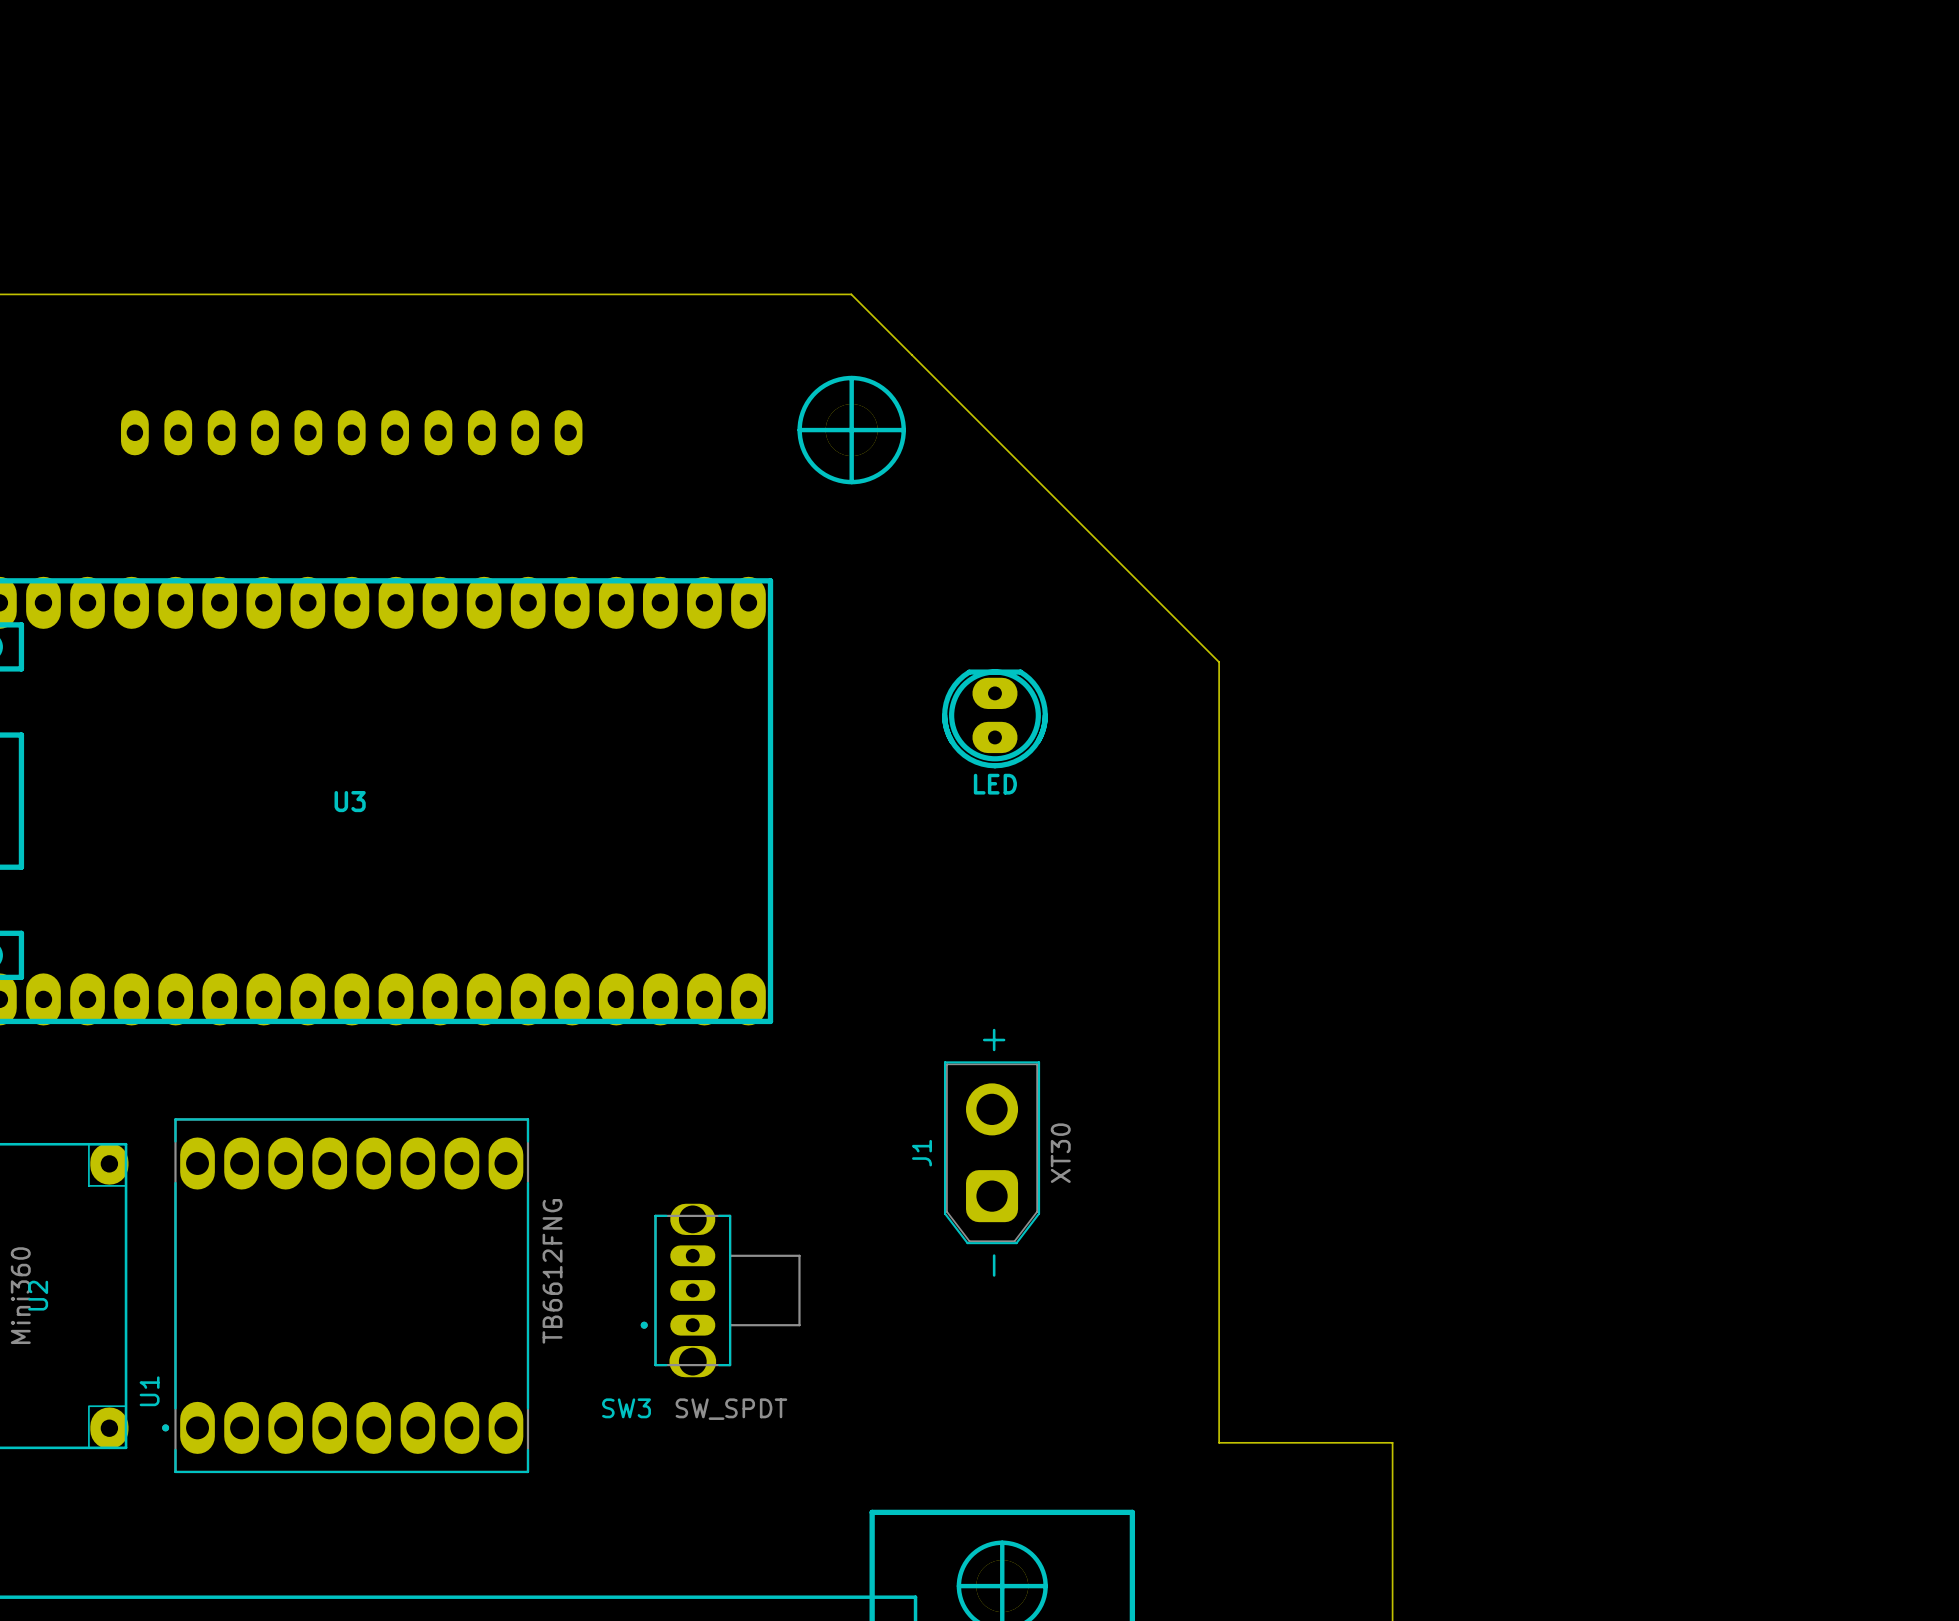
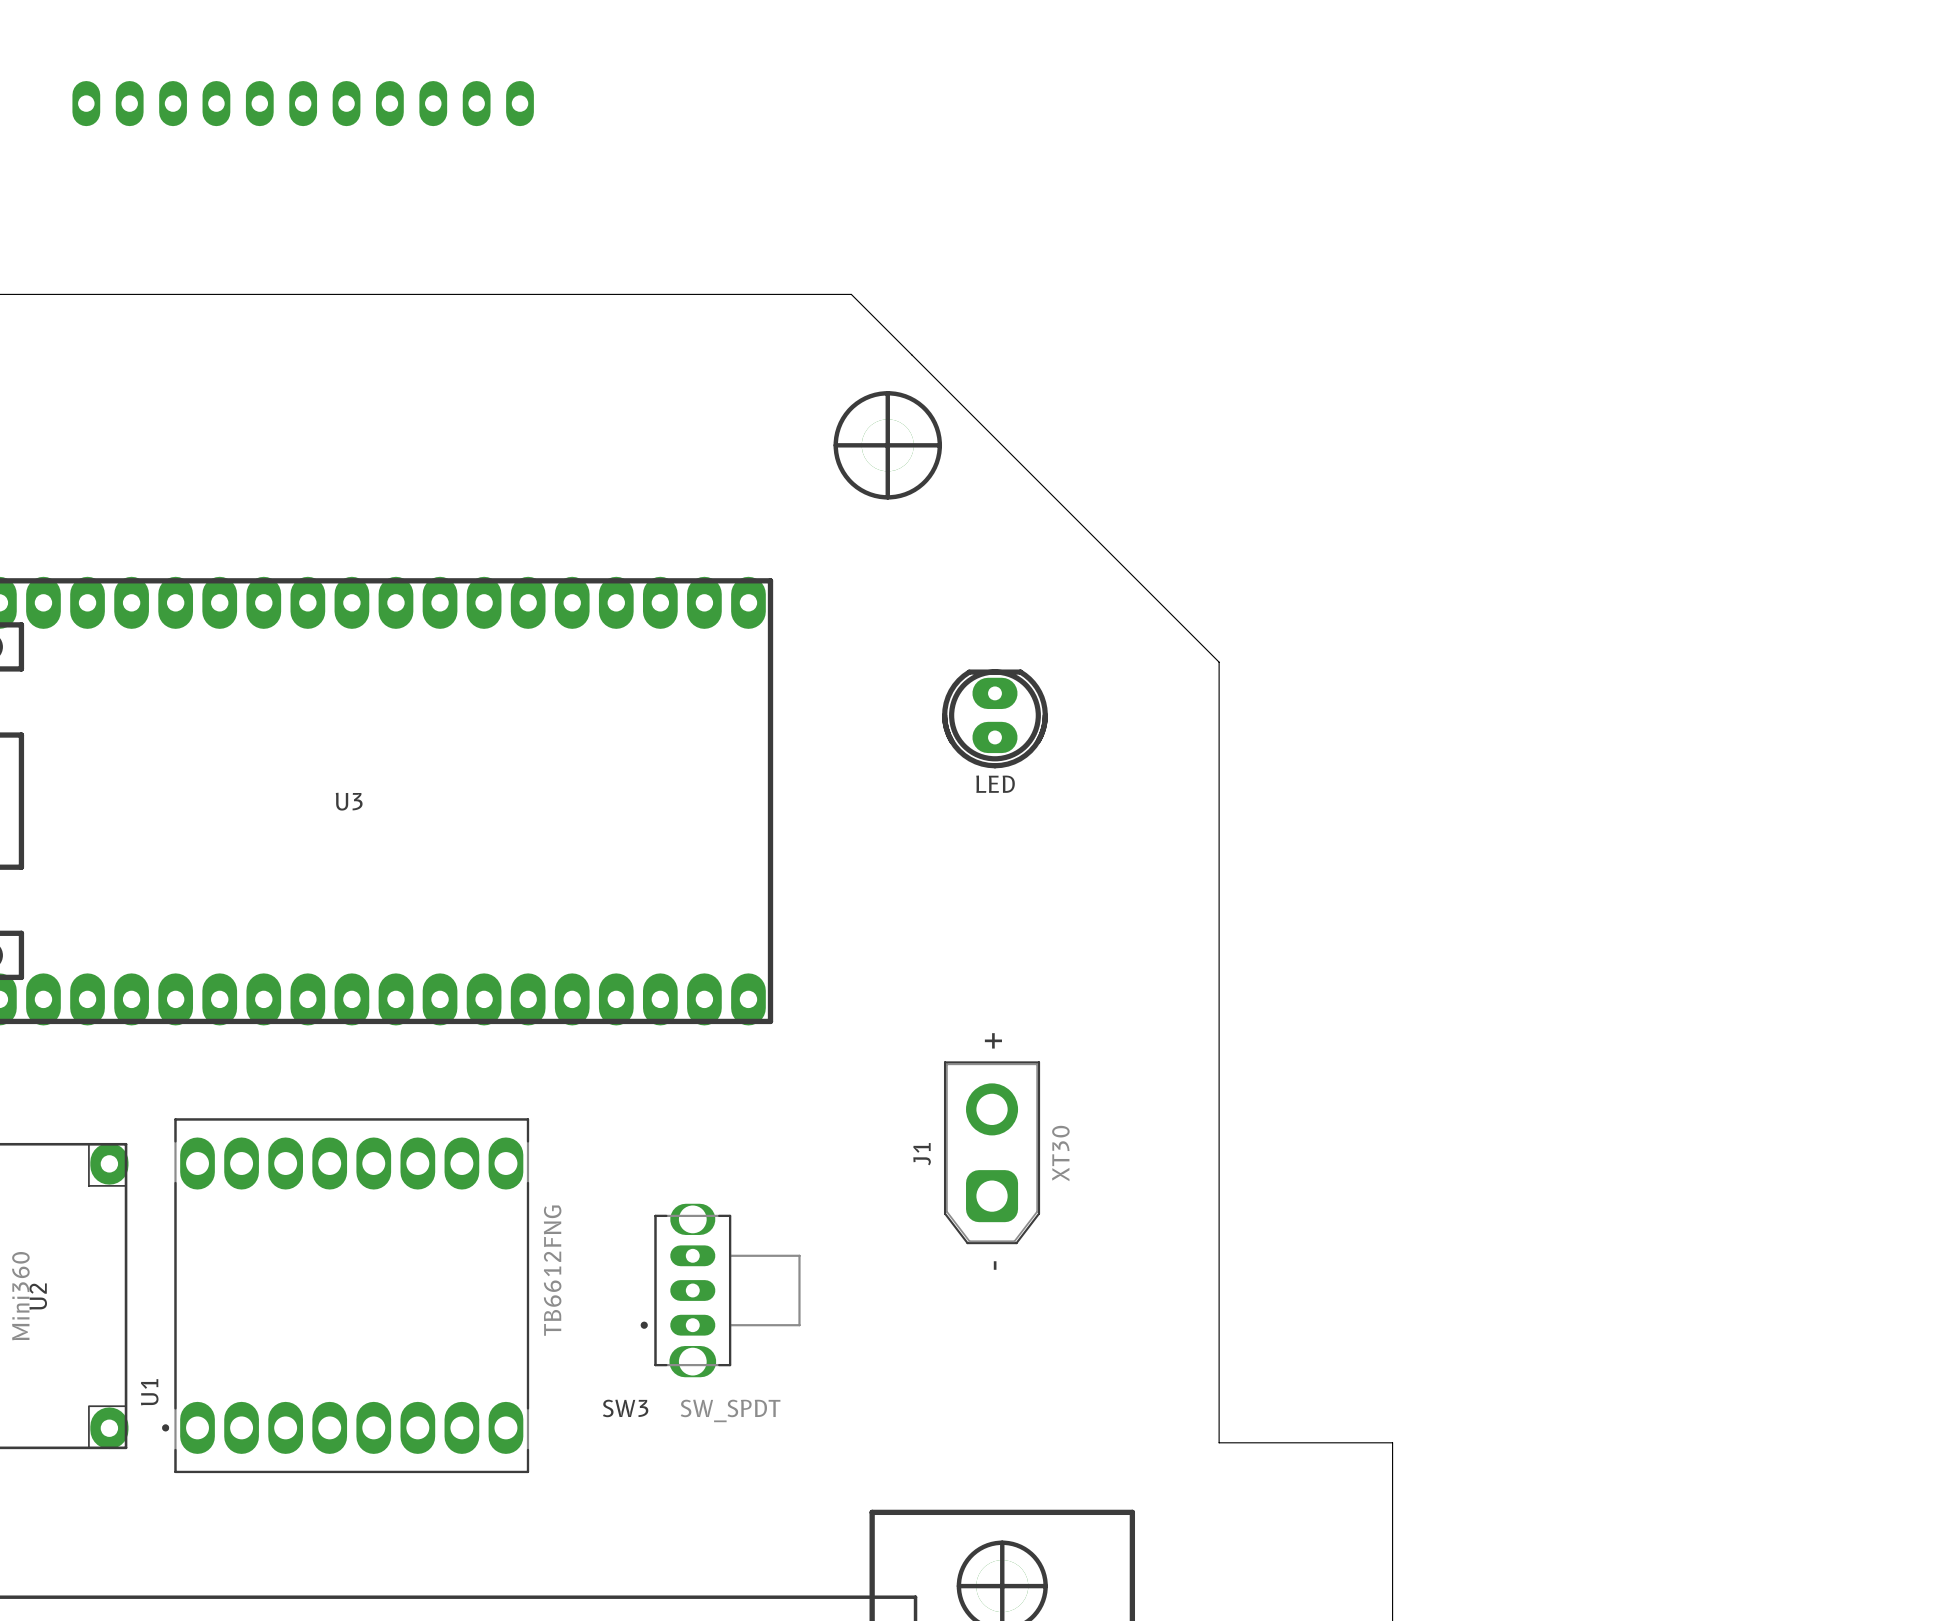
part position: (851, 430) -> (887, 445)
part position: (351, 432) -> (303, 103)

